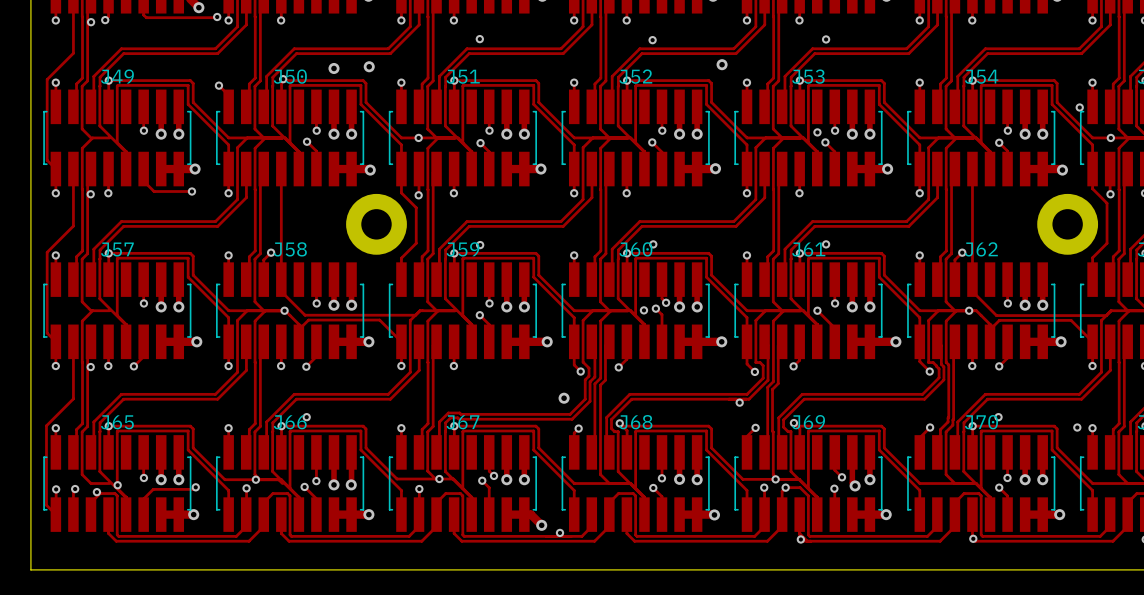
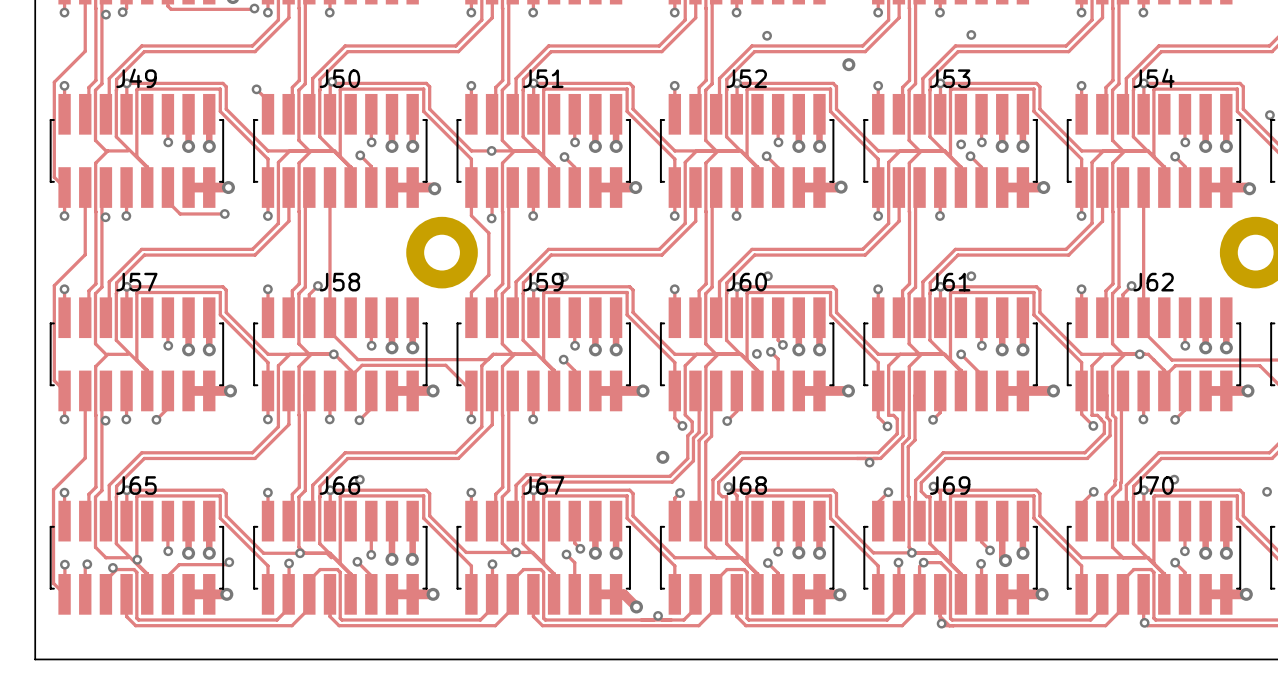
via: (479, 39) -> none
via: (369, 66) -> none
via: (333, 68) -> none

